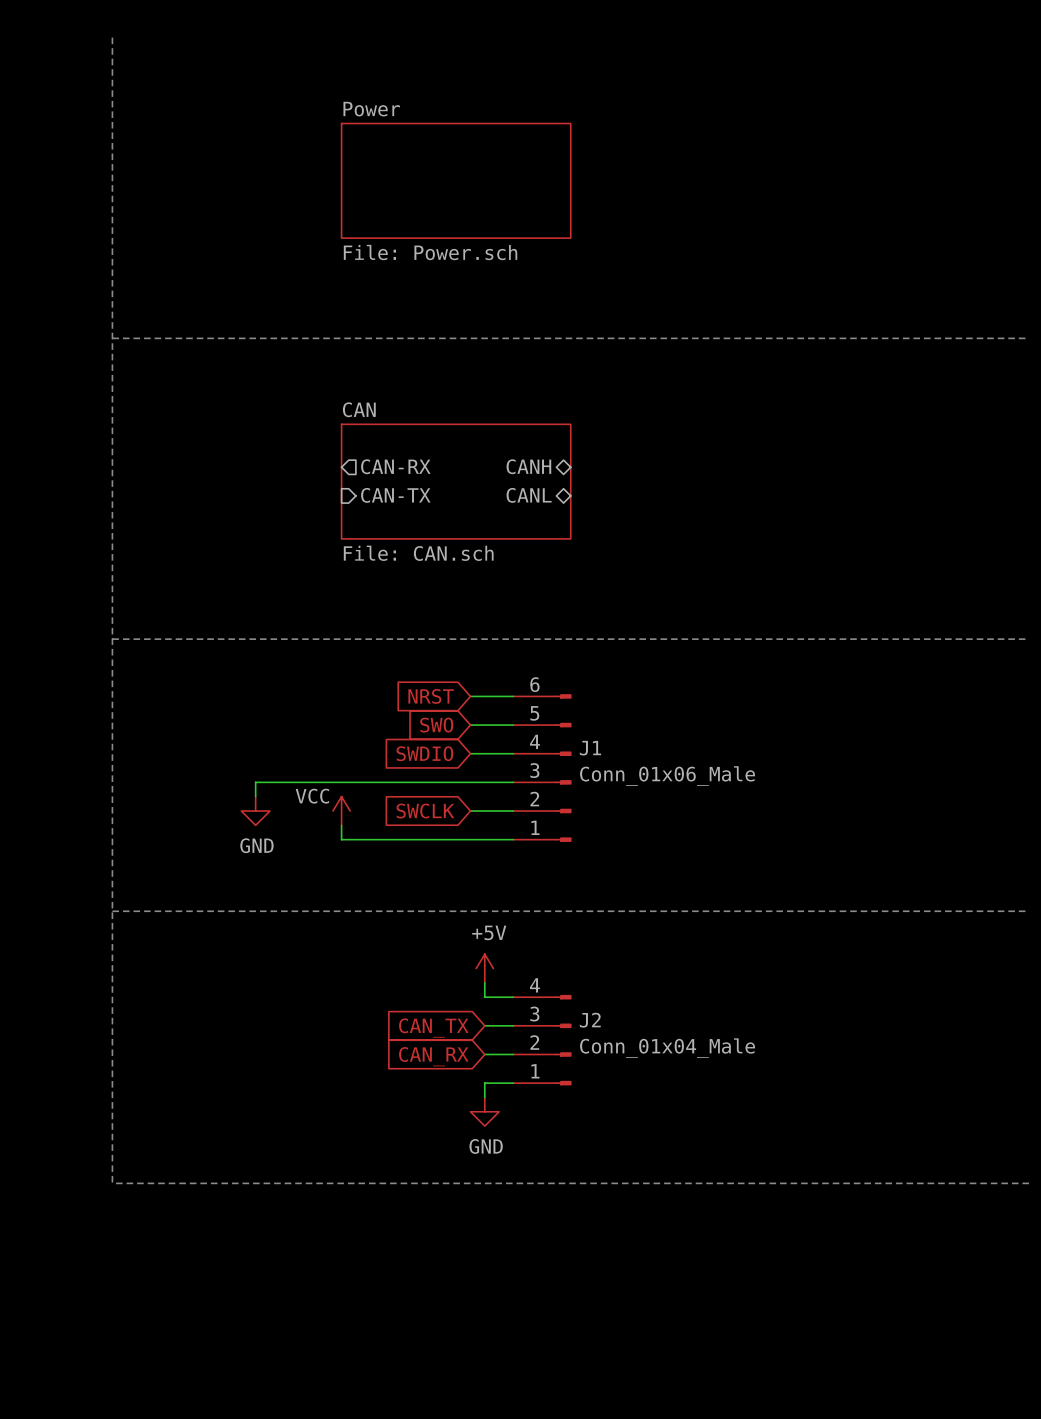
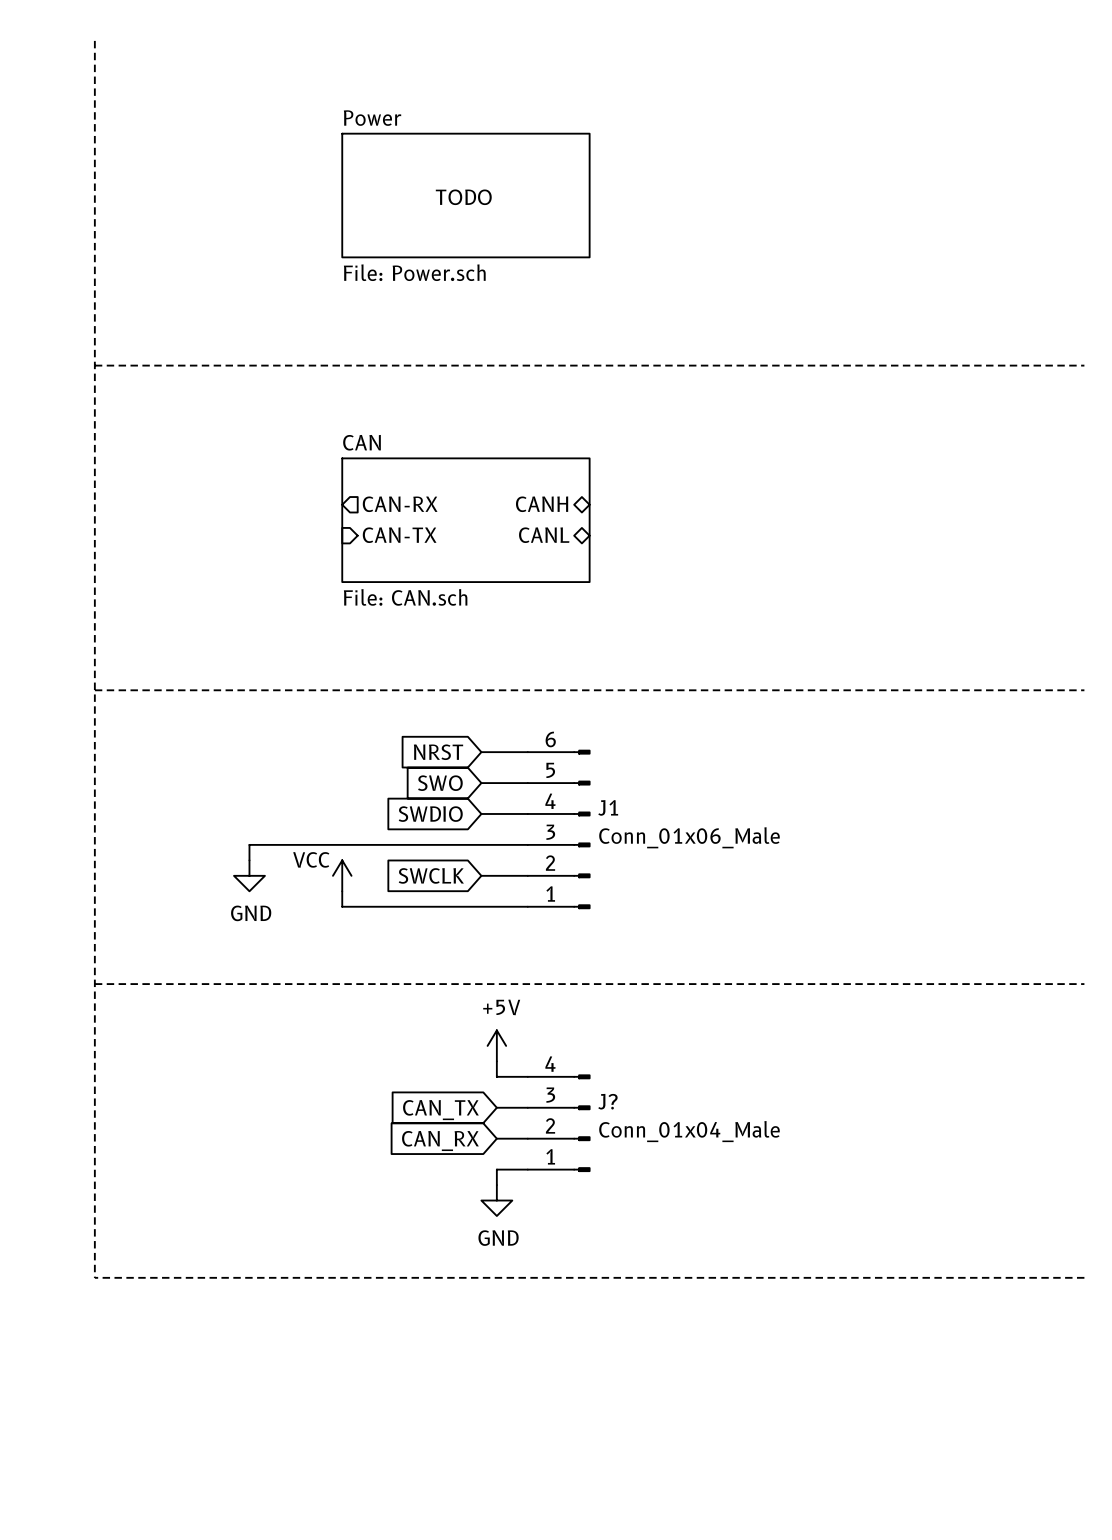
label: none -> TODO (463, 197)
J2 name: J2 (590, 1020) -> J? (607, 1101)

